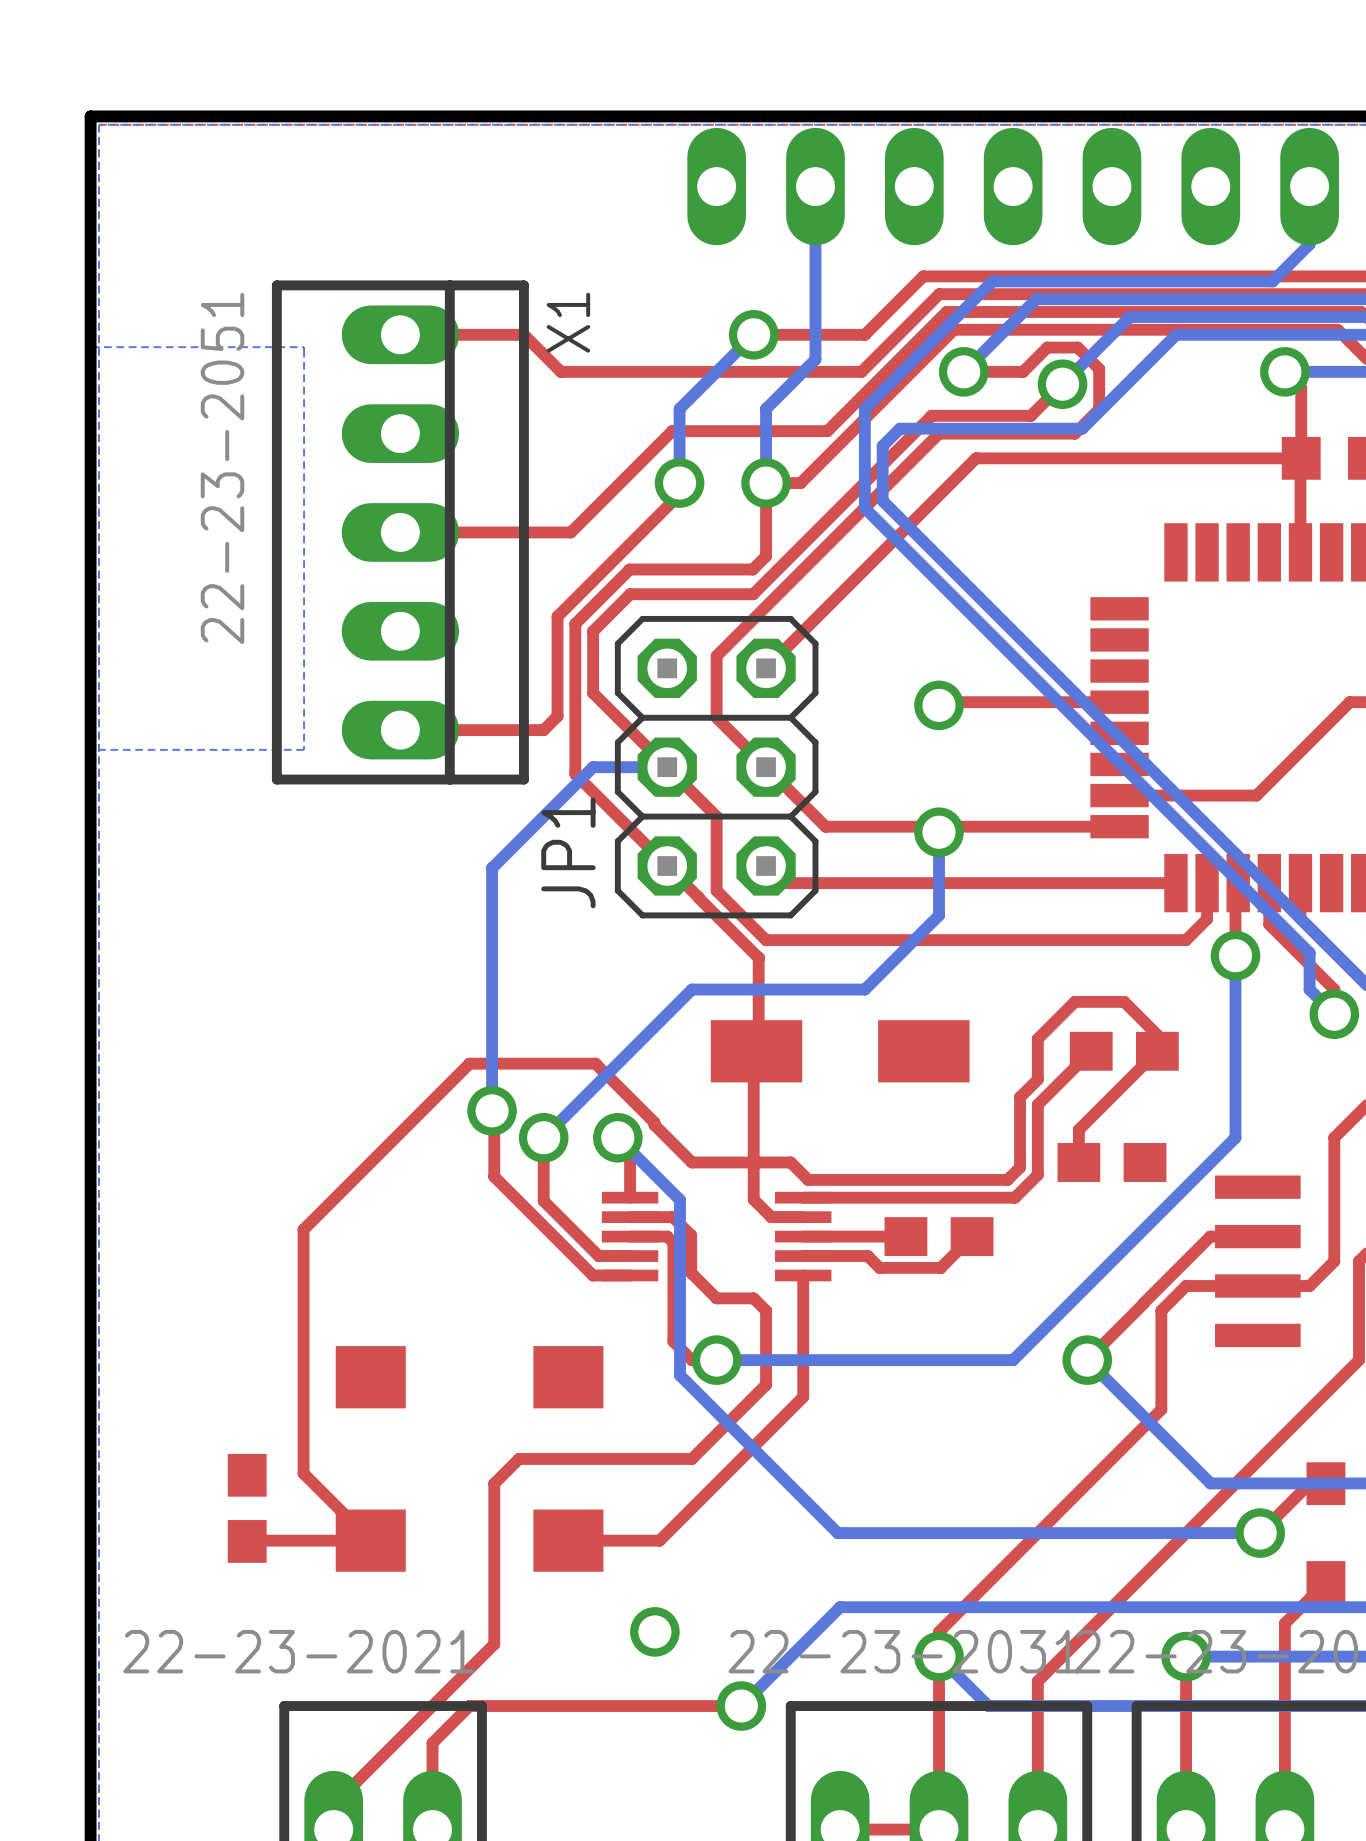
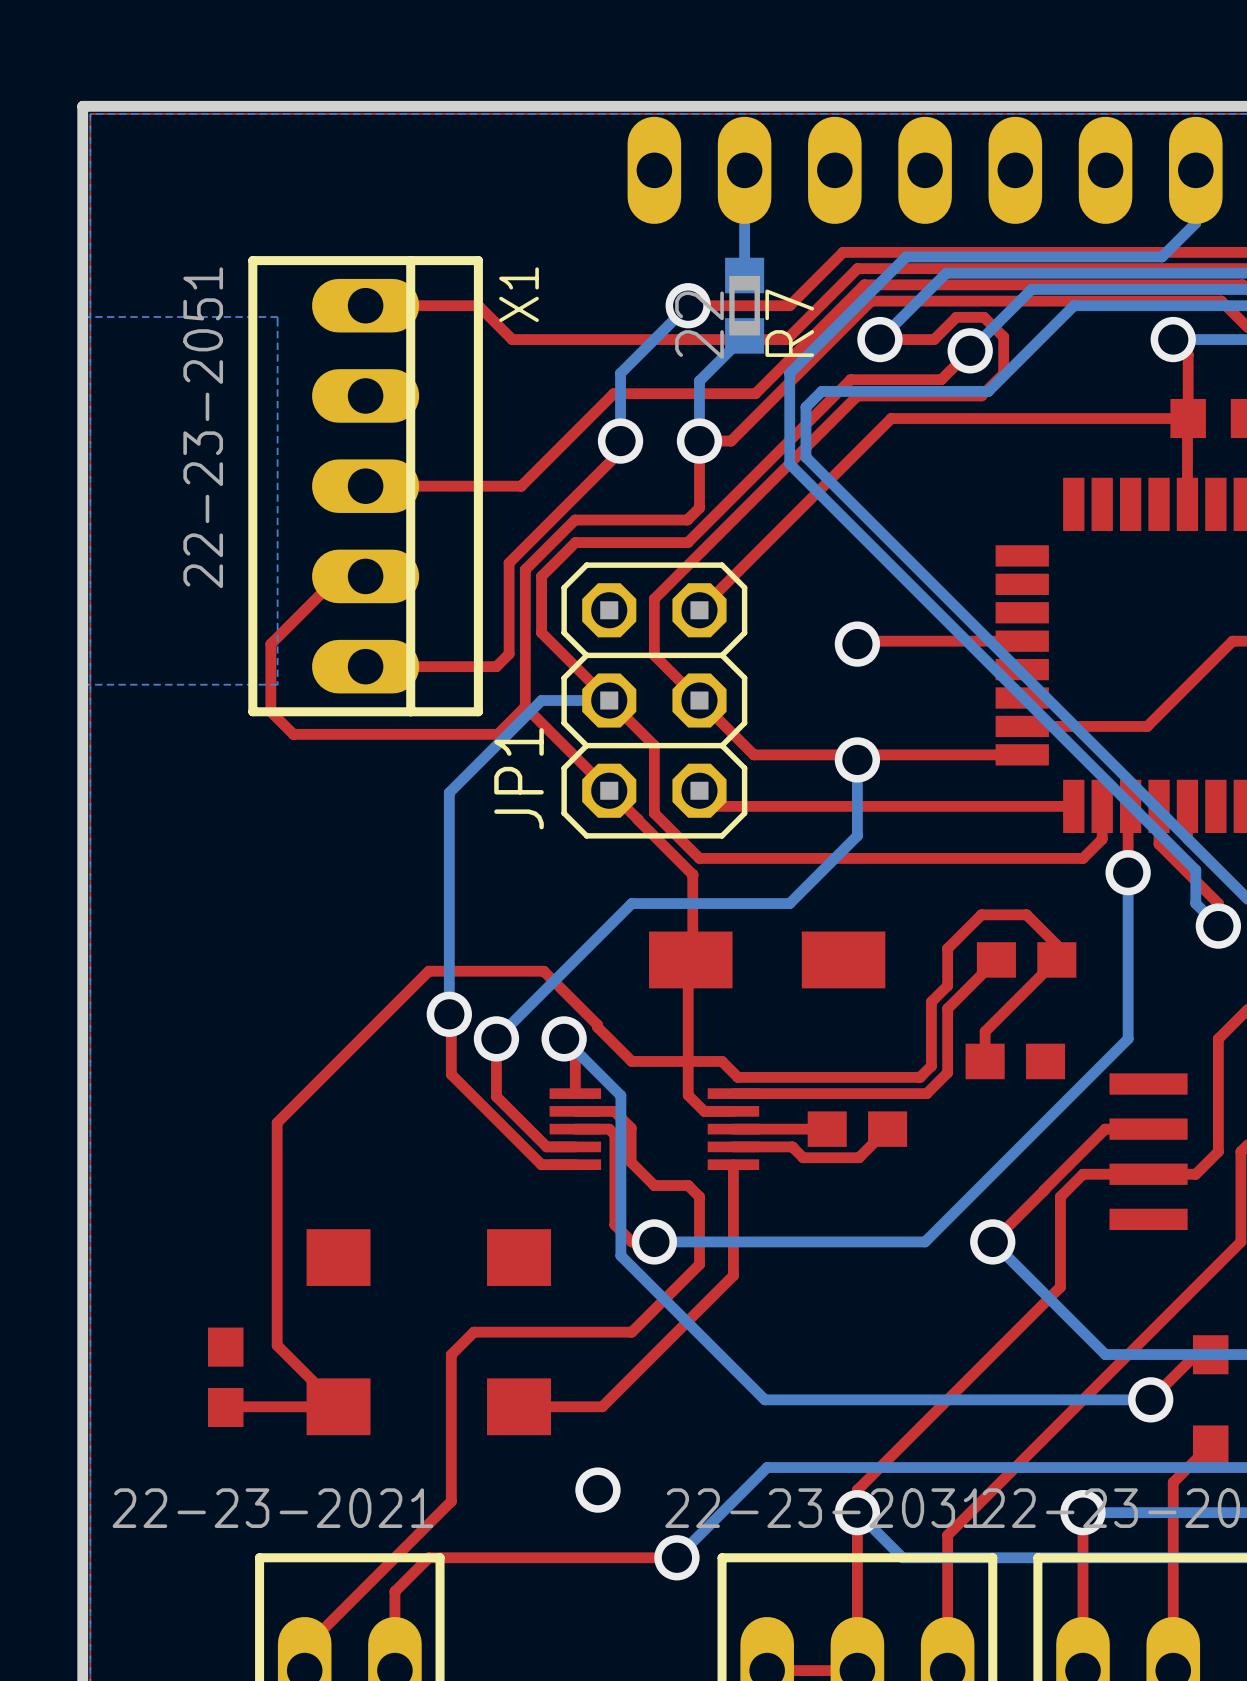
bottom track: (815, 301) (815, 359) (766, 408) (766, 417) -> (744, 335) (699, 381)
R7: none -> 22 (744, 305)
top track: none -> (365, 576) (338, 576) (270, 644) (270, 711) (293, 734) (497, 734) (525, 706)

